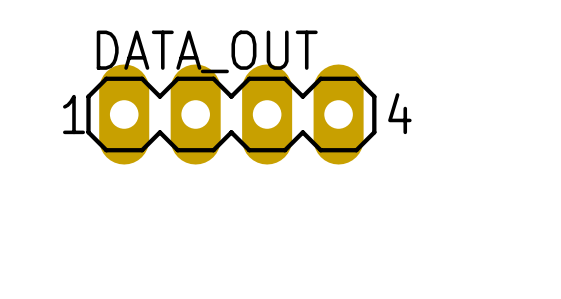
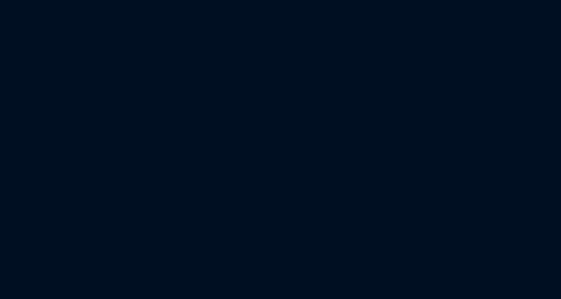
DATA_OUT: (231, 114) -> none

